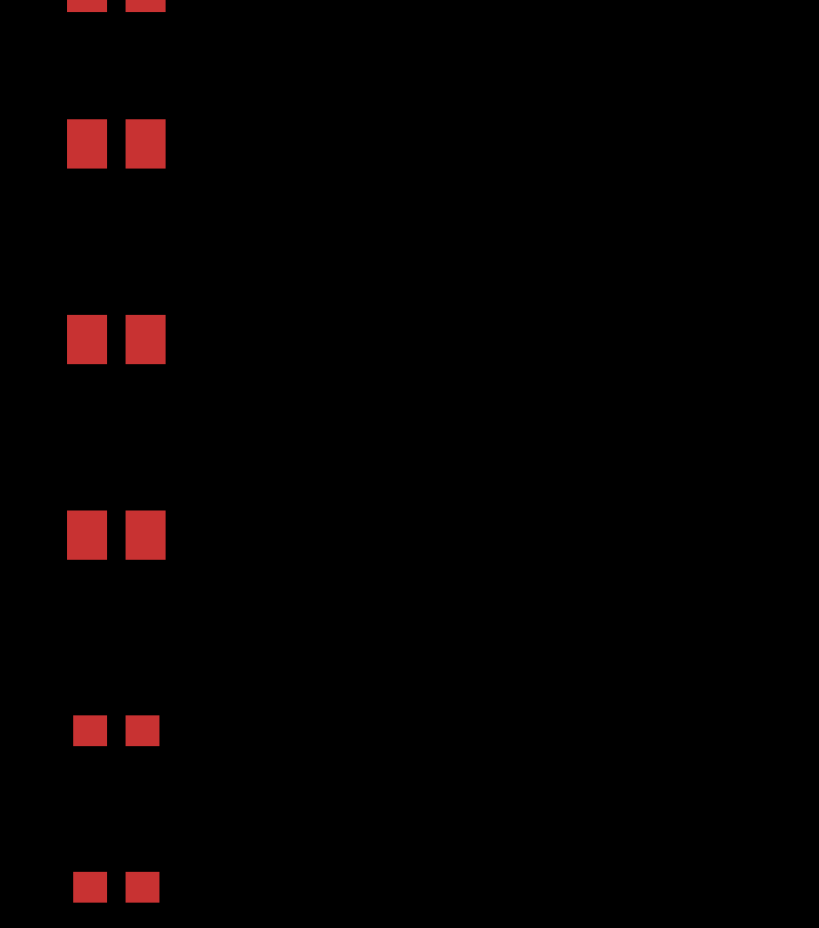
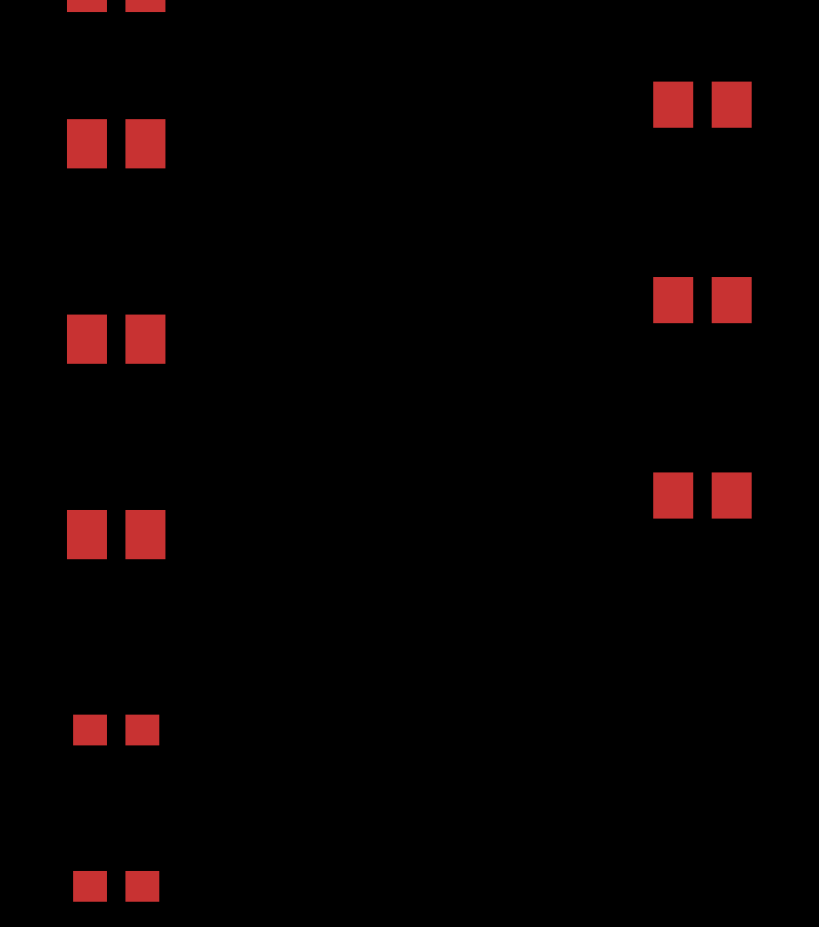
part: none -> (702, 104)
part: none -> (702, 300)
part: none -> (702, 495)

